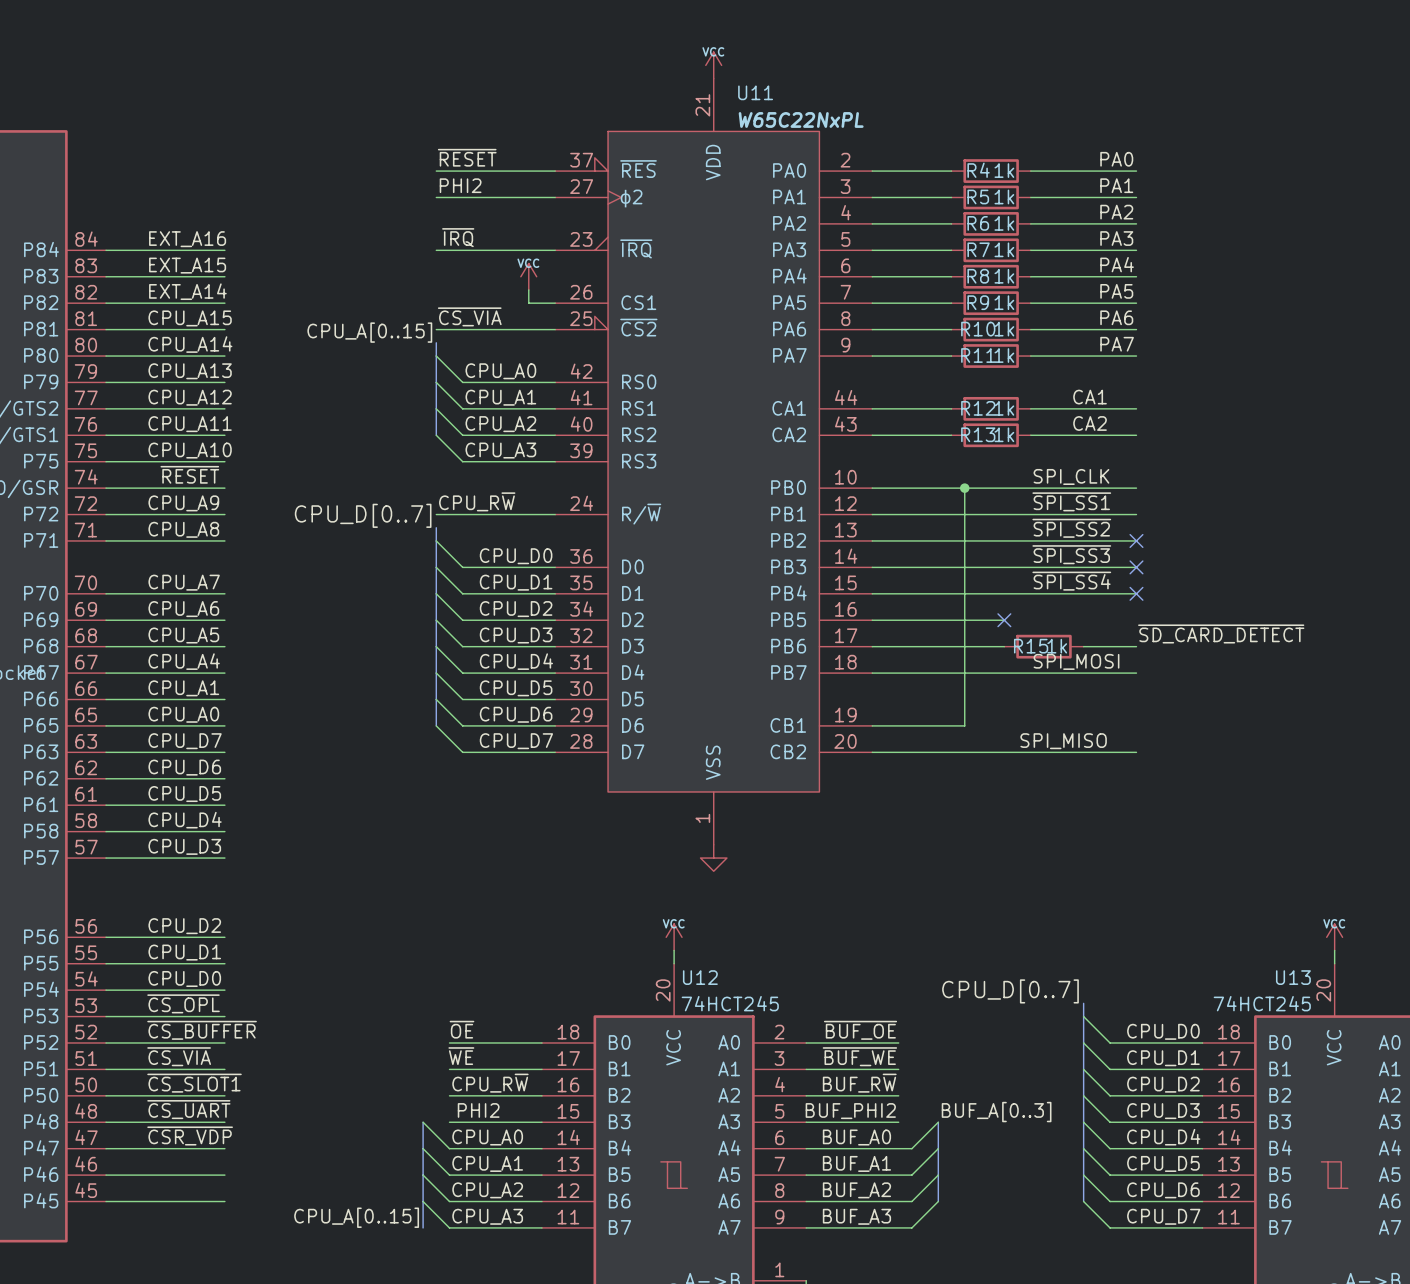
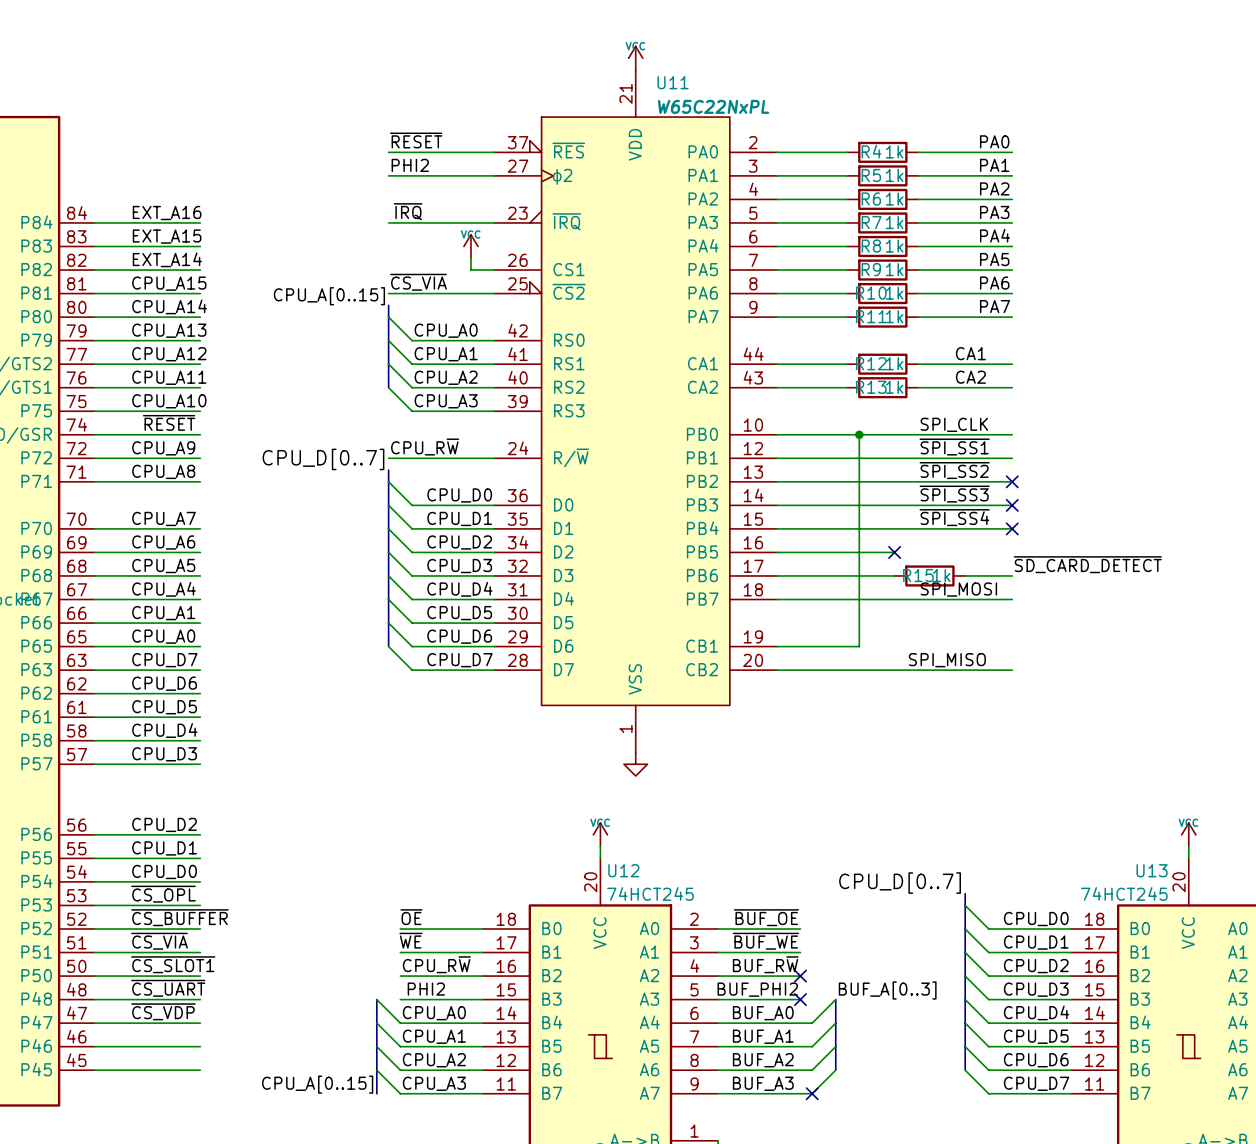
no-connect mark: none -> (800, 976)
no-connect mark: none -> (800, 999)
label: ~{CSR_VDP} (190, 1136) -> ~{CS_VDP} (163, 1011)
no-connect mark: none -> (812, 1093)

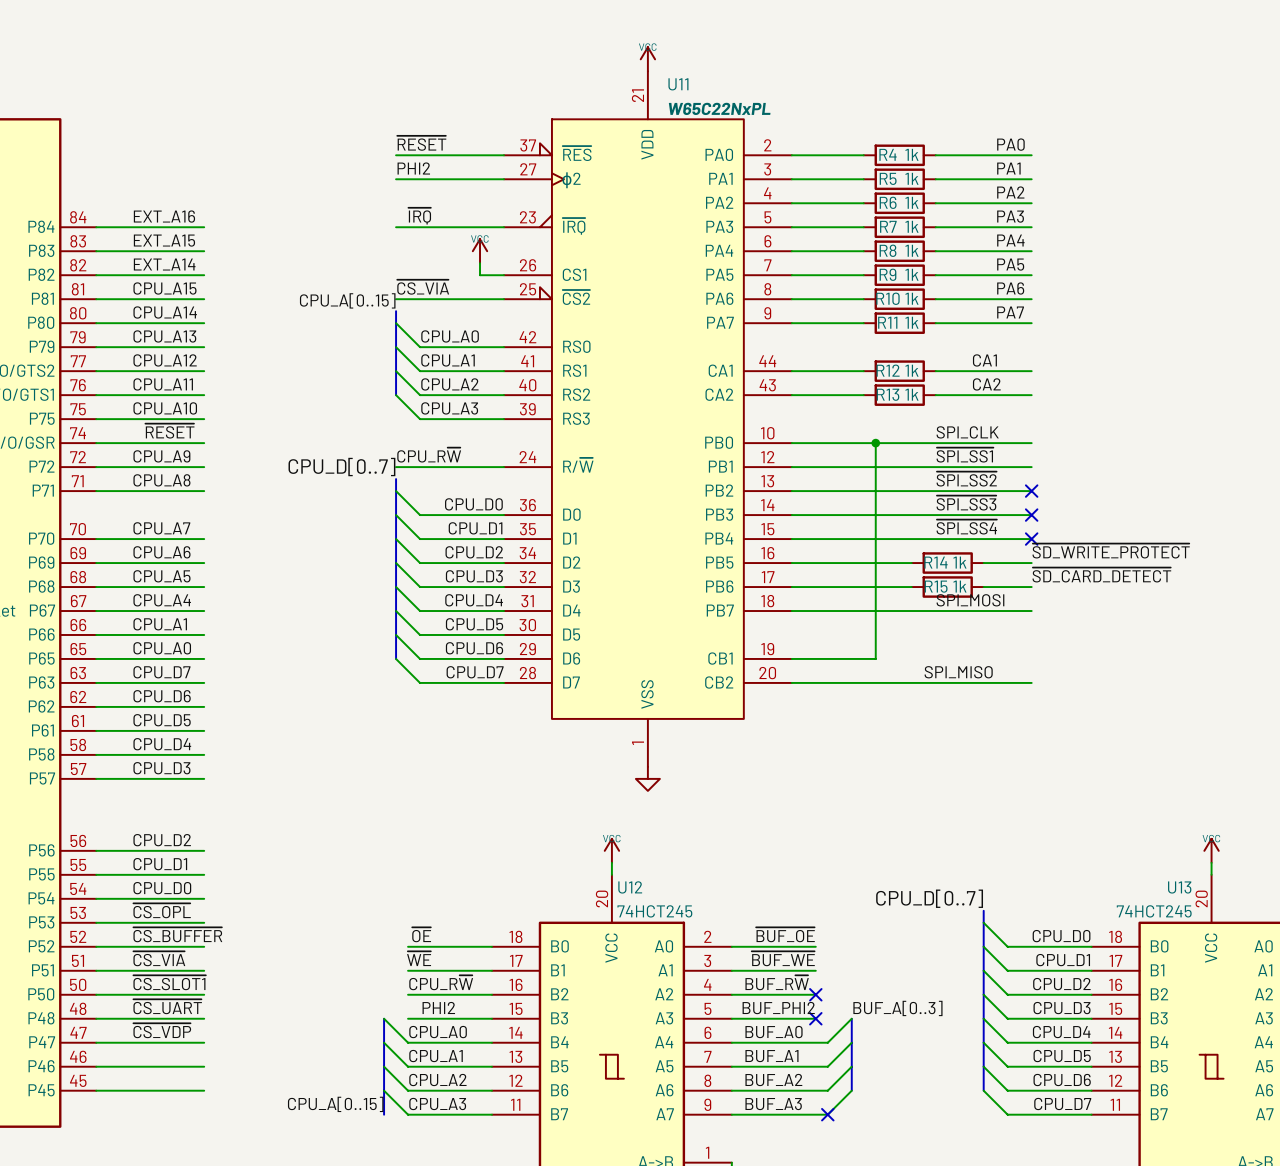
label: none -> ~{SD_WRITE_PROTECT} (1111, 551)
no-connect mark: (894, 552) -> none
R14: none -> 1k (947, 563)
wire: none -> (983, 563) (1031, 563)

